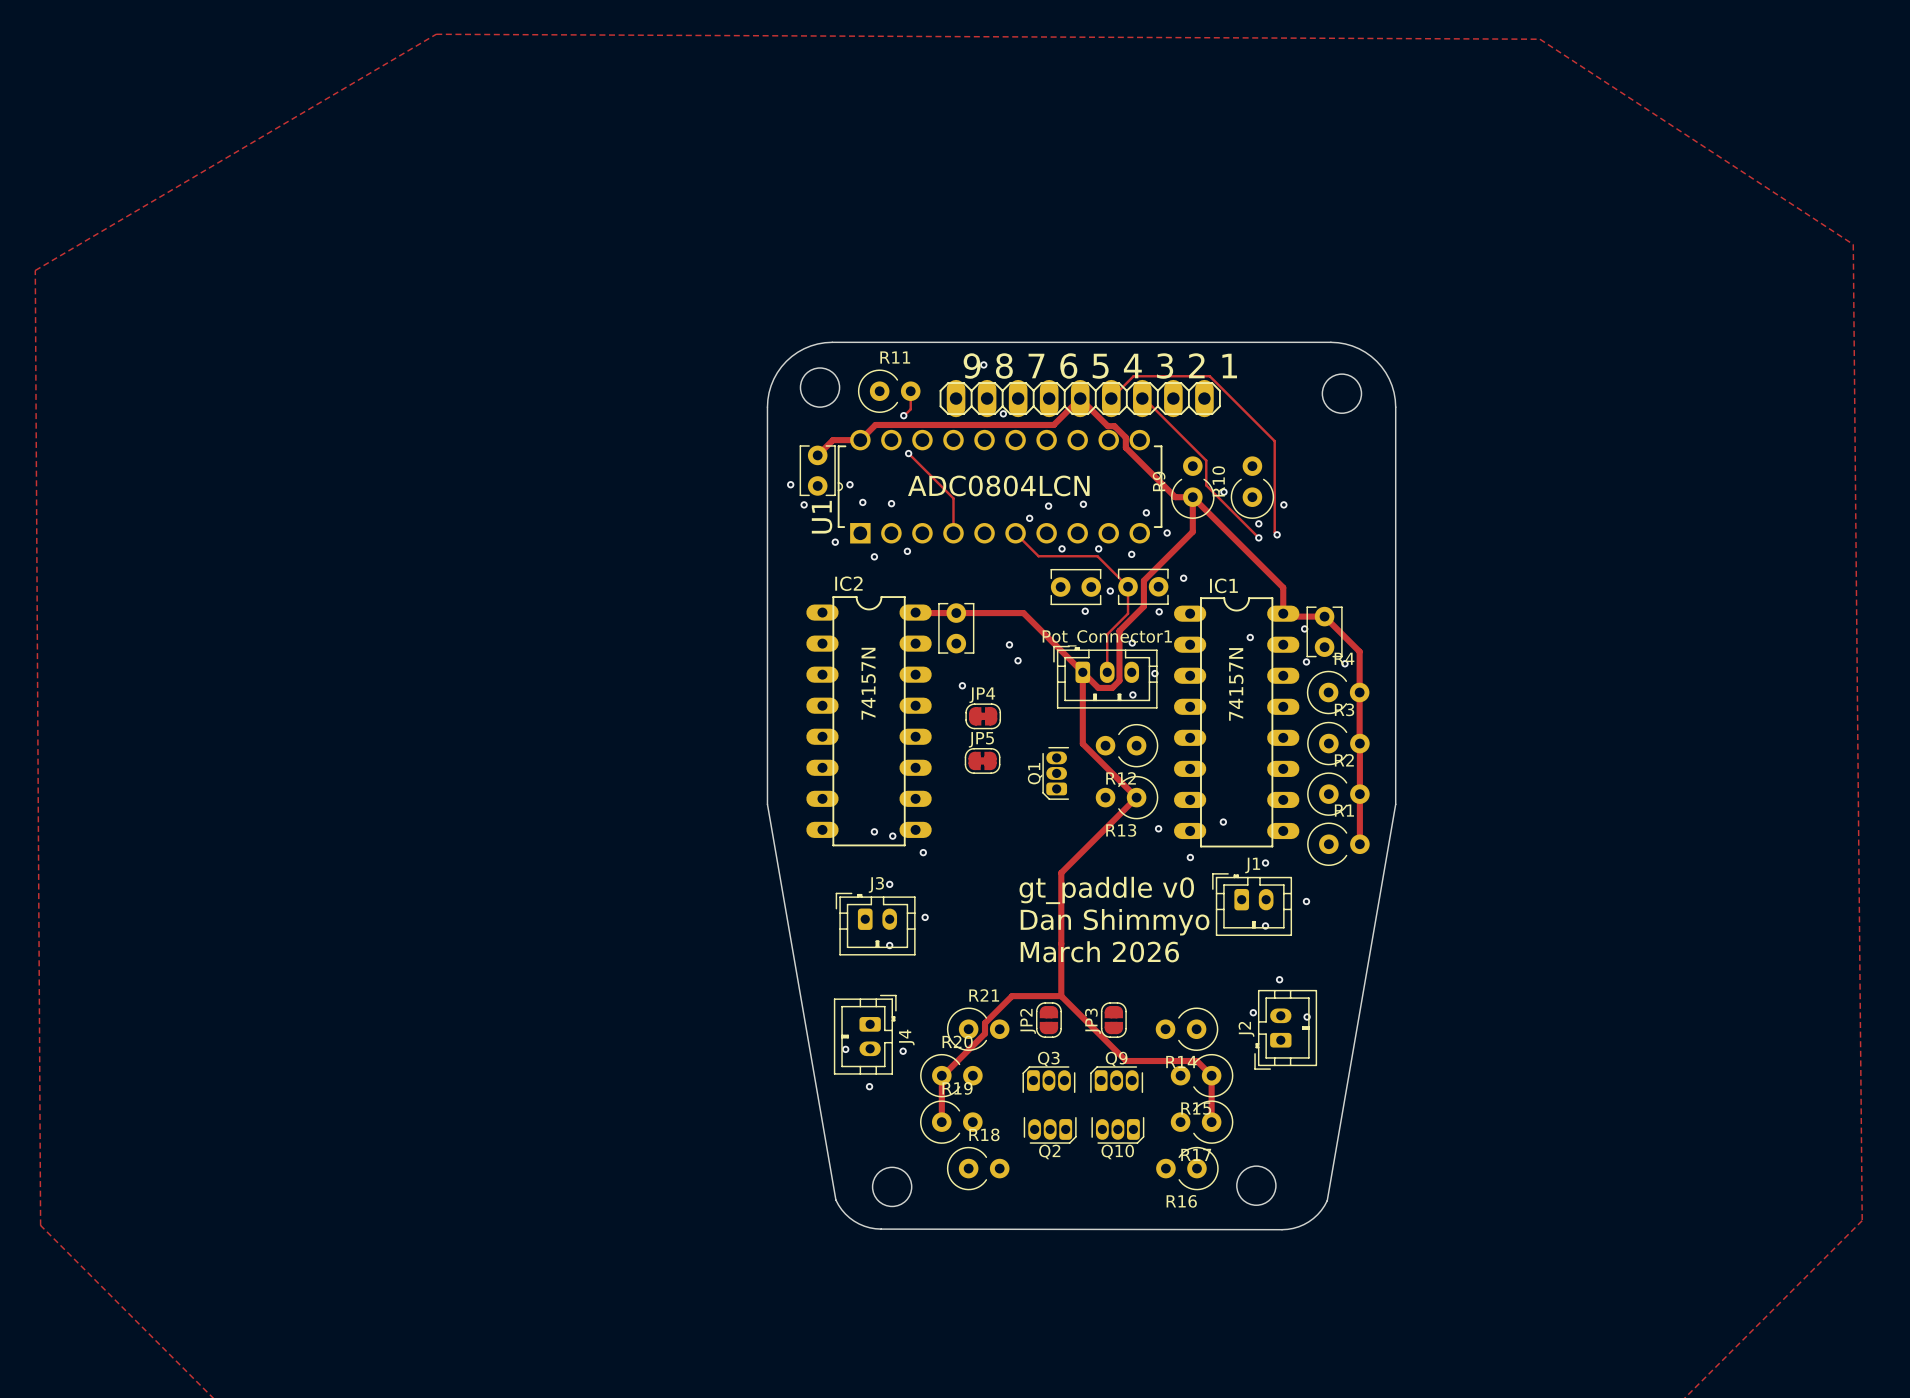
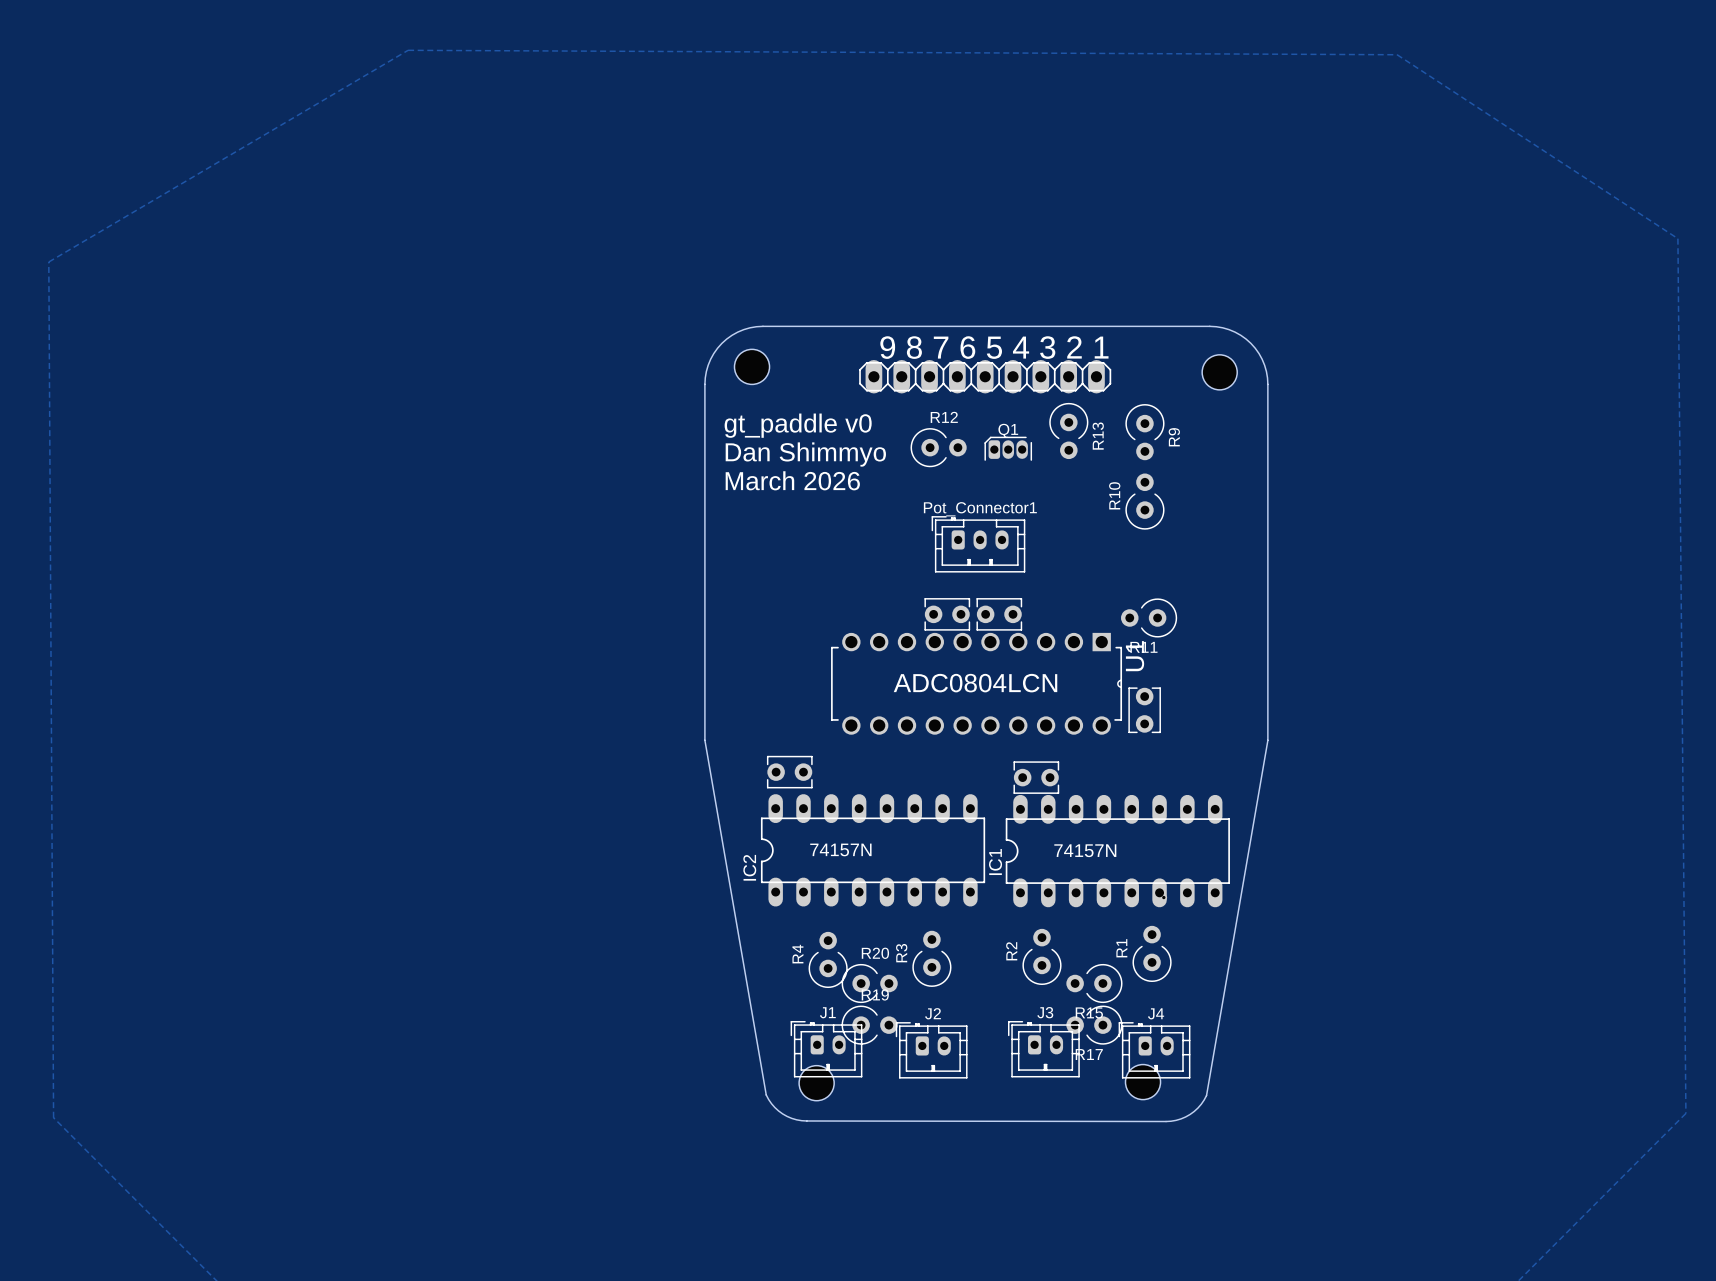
via: (983, 364) -> none
R11 rotation: 0° (889, 391) -> 180° (1149, 617)
R11 position: (889, 391) -> (1149, 617)
track: (910, 391) (910, 409) (904, 415) -> none
track: (1111, 398) (1133, 376) (1209, 376) (1274, 441) (1274, 532) (1277, 534) -> none
track: (1142, 398) (1206, 460) (1206, 485) (1258, 537) -> none
via: (1003, 413) -> none
via: (903, 415) -> none
text: none -> gt_paddle v0 (798, 425)
track: (908, 453) (953, 498) (953, 533) -> none
via: (908, 453) -> none
track: (817, 455) (832, 440) (860, 440) (875, 424) (1053, 424) (1080, 398) (1107, 426) (1114, 426) (1125, 437) (1125, 447) (1175, 497) (1192, 497) -> none
part: (817, 470) -> none
via: (790, 484) -> none
via: (849, 484) -> none
text: none -> Dan Shimmyo (805, 454)
U1 rotation: 0° (1000, 486) -> 180° (976, 683)
U1 position: (1000, 486) -> (976, 683)
R9 rotation: 0° (1192, 487) -> 180° (1144, 432)
R9 position: (1192, 487) -> (1144, 432)
R10 position: (1252, 487) -> (1144, 501)
via: (1223, 492) -> none
track: (1192, 497) (1192, 531) (1143, 580) (1143, 606) (1119, 630) (1119, 680) (1112, 687) (1098, 687) (1023, 613) (915, 612) -> none
track: (1192, 497) (1283, 587) (1283, 613) (1286, 616) (1324, 616) (1359, 651) (1359, 844) -> none
via: (862, 502) -> none
via: (891, 503) -> none
via: (804, 504) -> none
via: (1083, 504) -> none
via: (1283, 504) -> none
via: (1048, 506) -> none
via: (1146, 512) -> none
text: none -> March 2026 (792, 480)
via: (1029, 518) -> none
via: (1258, 523) -> none
track: (1015, 533) (1038, 556) (1097, 556) (1128, 586) (1128, 613) (1107, 634) (1107, 672) -> none
via: (1167, 533) -> none
via: (1277, 534) -> none
via: (1258, 537) -> none
via: (835, 542) -> none
via: (1062, 548) -> none
via: (1098, 548) -> none
via: (907, 551) -> none
via: (1131, 554) -> none
via: (874, 556) -> none
via: (1183, 578) -> none
part: (1143, 586) -> none
part: (1075, 587) -> none
via: (1110, 591) -> none
via: (1085, 611) -> none
via: (1159, 611) -> none
part: (956, 628) -> none
via: (1304, 628) -> none
part: (1324, 631) -> none
via: (1250, 637) -> none
via: (1132, 643) -> none
via: (1009, 644) -> none
via: (1018, 660) -> none
via: (1306, 661) -> none
part: none -> (947, 614)
part: none -> (999, 614)
via: (1344, 663) -> none
track: (1082, 672) (1082, 743) (1136, 797) (1061, 872) (1061, 996) -> none
via: (1154, 673) -> none
Pot_Connector1 position: (1105, 677) -> (978, 544)
via: (962, 685) -> none
R4 rotation: 0° (1338, 692) -> 90° counterclockwise (828, 959)
R4 position: (1338, 692) -> (828, 959)
via: (1132, 694) -> none
JP4: (983, 716) -> none
IC2 rotation: 0° (869, 721) -> 90° counterclockwise (873, 850)
IC2 position: (869, 721) -> (873, 850)
IC1 rotation: 0° (1236, 722) -> 90° counterclockwise (1117, 851)
IC1 position: (1236, 722) -> (1117, 851)
R3 rotation: 0° (1338, 743) -> 90° counterclockwise (931, 958)
R3 position: (1338, 743) -> (931, 958)
R12 rotation: 0° (1127, 745) -> 180° (938, 447)
R12 position: (1127, 745) -> (938, 447)
JP5: (982, 760) -> none
part: none -> (1144, 710)
Q1 rotation: 0° (1055, 773) -> 90° clockwise (1008, 448)
Q1 position: (1055, 773) -> (1008, 448)
R2 rotation: 0° (1338, 794) -> 90° counterclockwise (1041, 956)
R2 position: (1338, 794) -> (1041, 956)
R13 rotation: 0° (1127, 797) -> 90° counterclockwise (1068, 431)
R13 position: (1127, 797) -> (1068, 431)
via: (1223, 822) -> none
via: (1158, 828) -> none
via: (874, 831) -> none
via: (892, 836) -> none
part: none -> (789, 772)
R1 rotation: 0° (1338, 844) -> 90° counterclockwise (1152, 953)
R1 position: (1338, 844) -> (1152, 953)
part: none -> (1036, 777)
via: (923, 852) -> none
via: (1190, 857) -> none
via: (1265, 863) -> none
via: (889, 884) -> none
text: gt_paddle v0 (1106, 890) -> none
via: (1306, 901) -> none
J1 position: (1252, 904) -> (826, 1049)
via: (925, 917) -> none
text: Dan Shimmyo (1115, 922) -> none
J3 position: (875, 924) -> (1043, 1049)
via: (1265, 925) -> none
via: (889, 945) -> none
text: March 2026 (1099, 951) -> none
track: (1061, 996) (1126, 1061) (1196, 1061) (1211, 1075) (1211, 1122) -> none
track: (1061, 996) (1012, 996) (985, 1023) (985, 1033) (941, 1075) (941, 1122) -> none
via: (1253, 1012) -> none
via: (1307, 1017) -> none
JP2: (1048, 1020) -> none
JP3: (1113, 1020) -> none
R21: (978, 1029) -> none
R14: (1187, 1029) -> none
J2 rotation: 0° (1285, 1029) -> 90° clockwise (931, 1050)
J2 position: (1285, 1029) -> (931, 1050)
J4 rotation: 0° (865, 1034) -> 90° counterclockwise (1154, 1050)
J4 position: (865, 1034) -> (1154, 1050)
via: (845, 1049) -> none
via: (903, 1051) -> none
Q3: (1048, 1079) -> none
Q9: (1116, 1079) -> none
via: (869, 1086) -> none
Q2: (1050, 1130) -> none
Q10: (1117, 1130) -> none
R18: (978, 1168) -> none
R16: (1187, 1168) -> none

